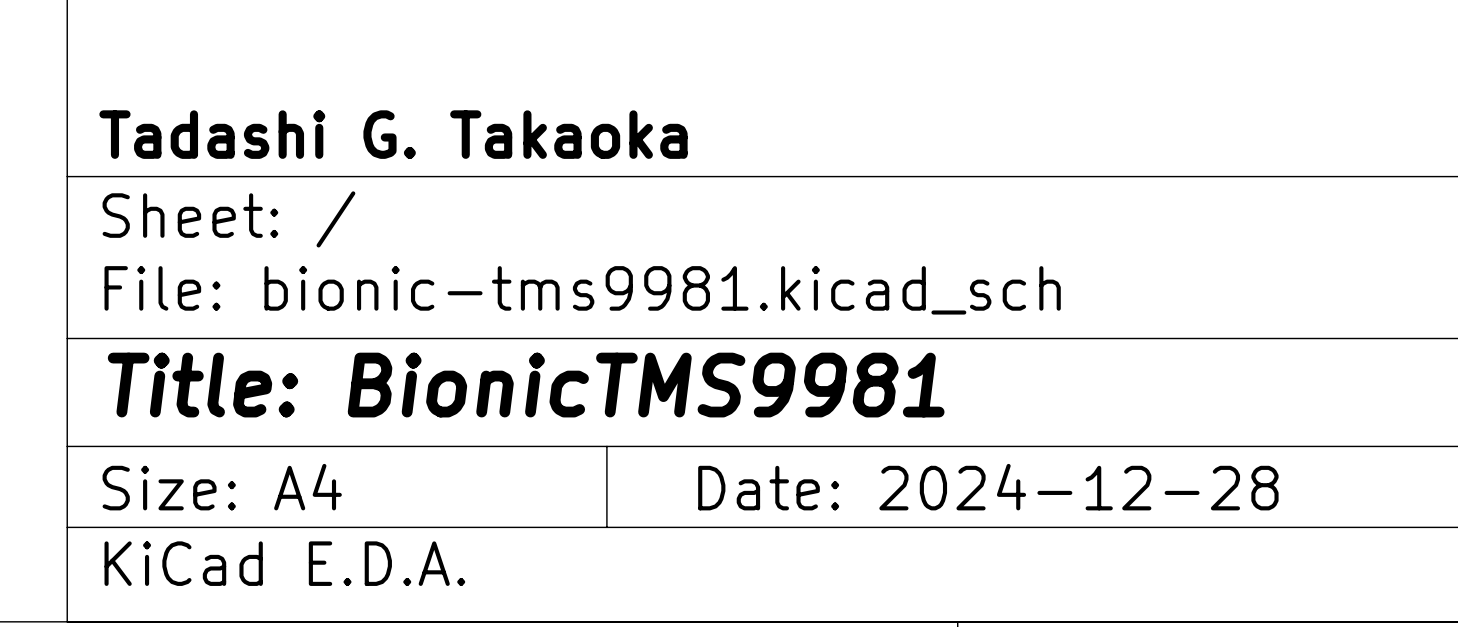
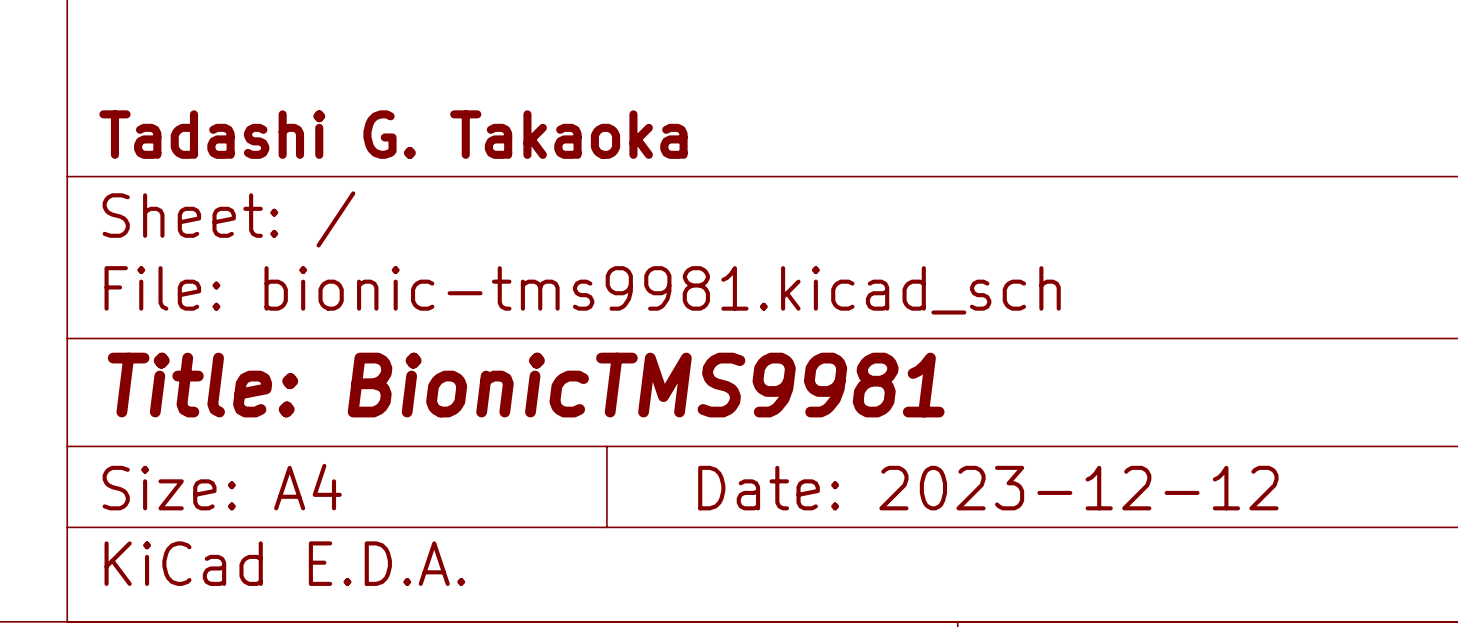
title block: Date: 2024-12-28 (988, 487) -> Date: 2023-12-12 (988, 488)

